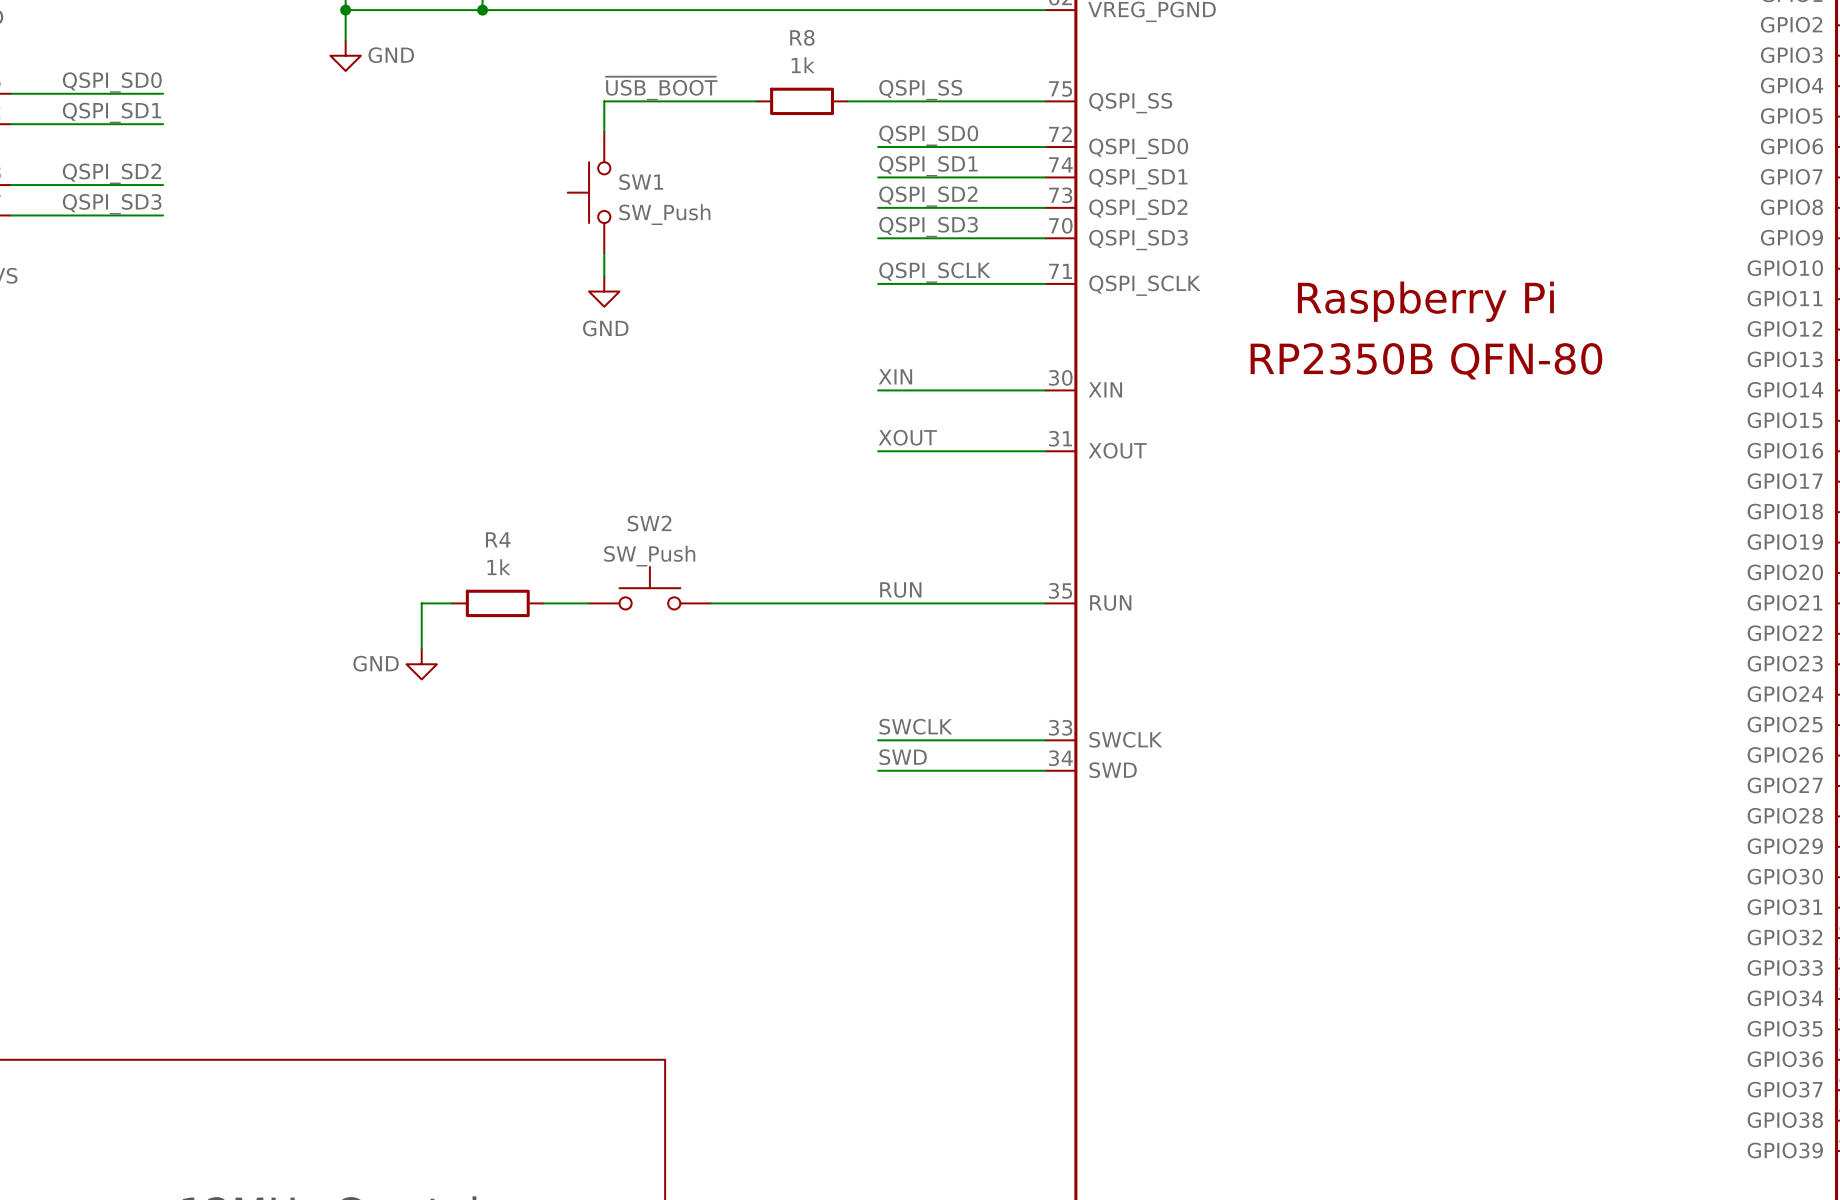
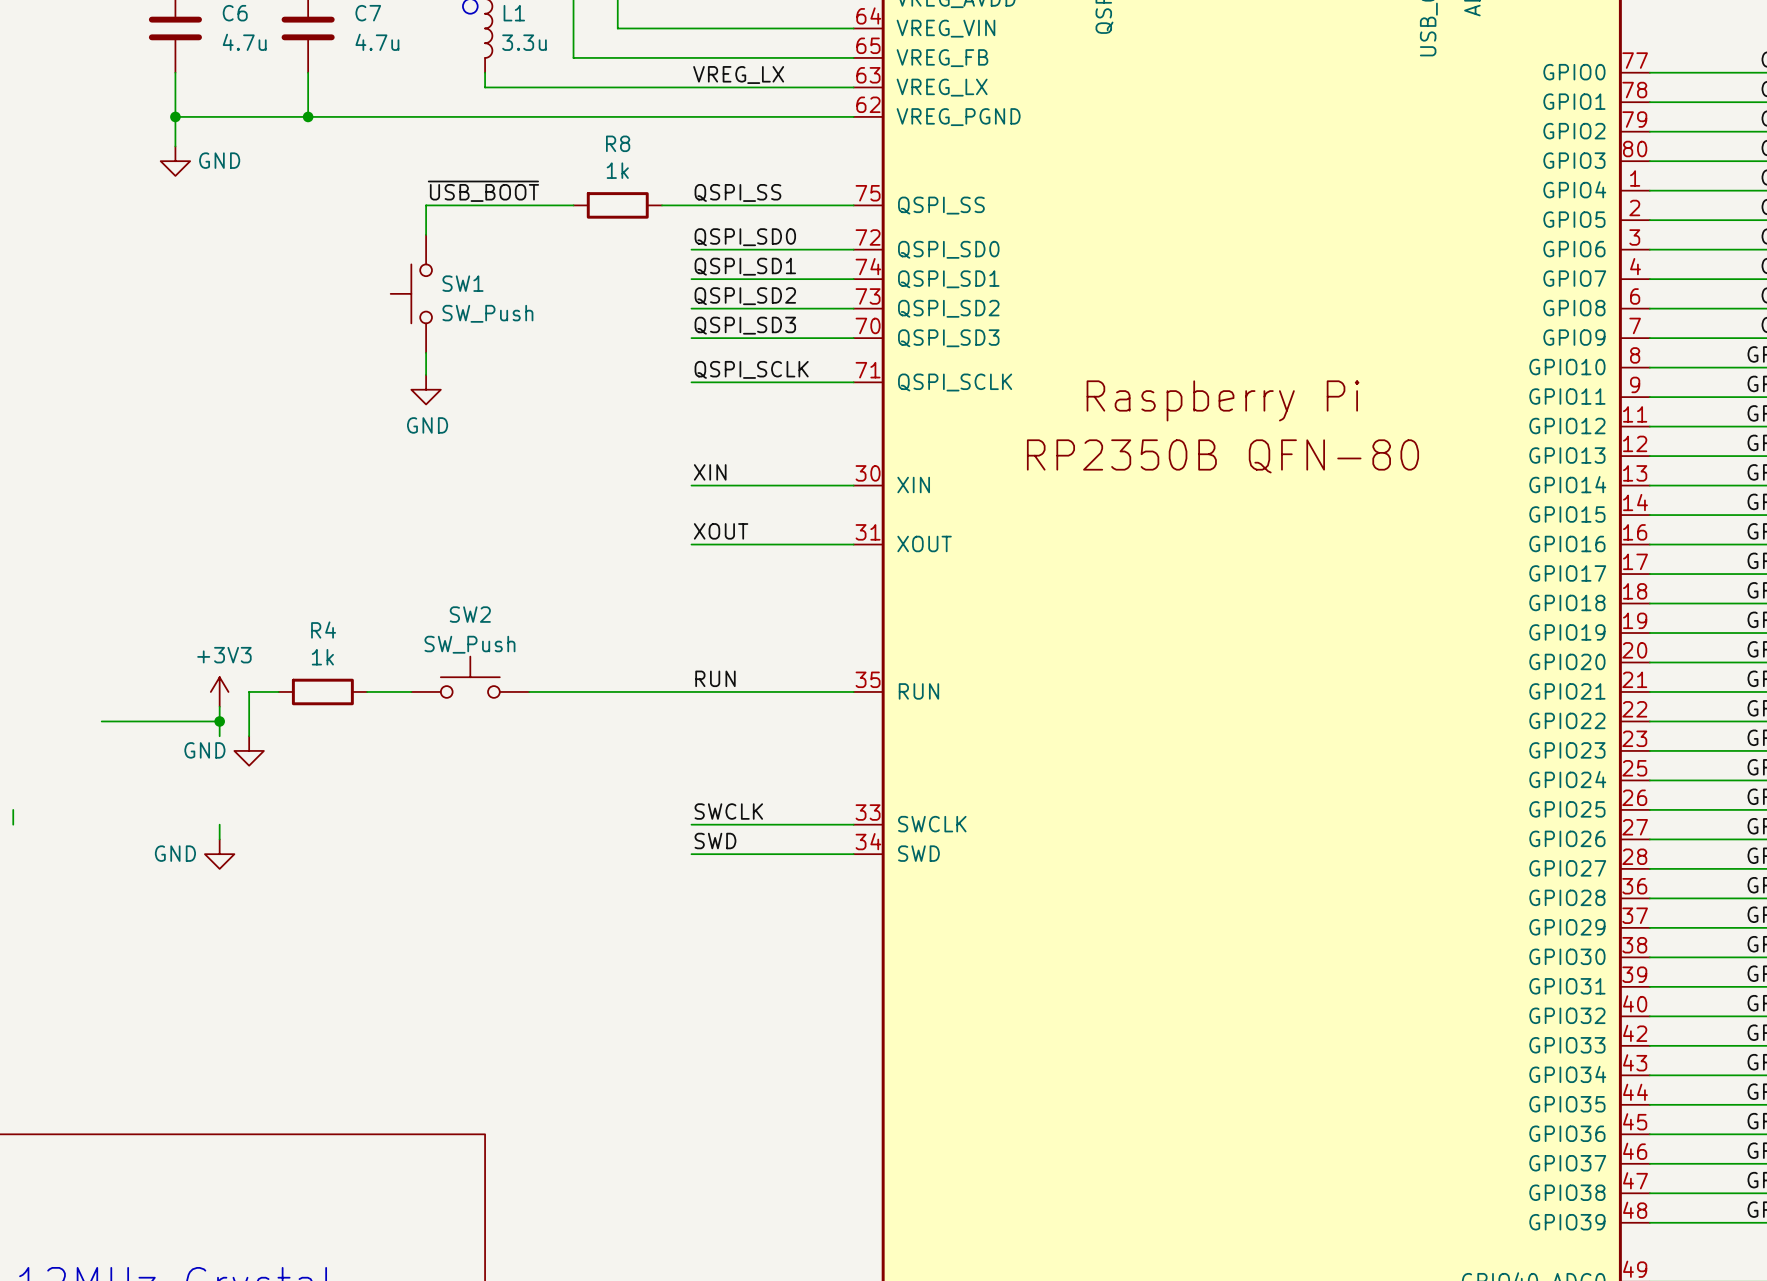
power symbol: none -> +3V3 (219, 691)
wire: none -> (219, 706) (219, 736)
wire: none -> (101, 721) (219, 721)
junction: none -> (219, 721)
wire: none -> (13, 809) (13, 824)
wire: none -> (219, 824) (219, 839)
power symbol: none -> GND (219, 854)

